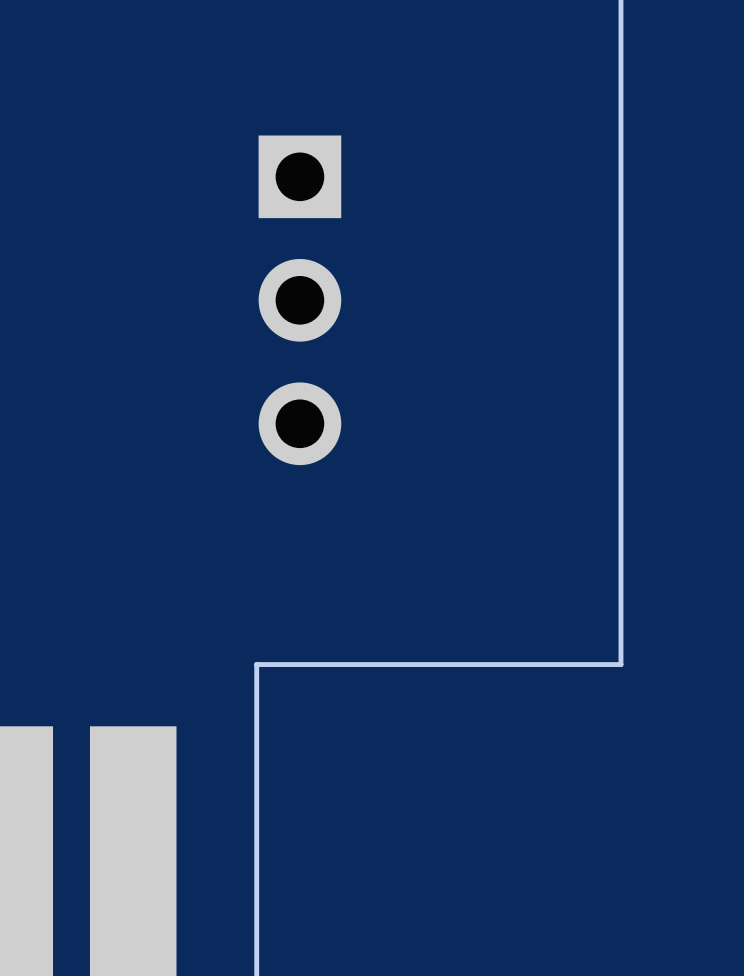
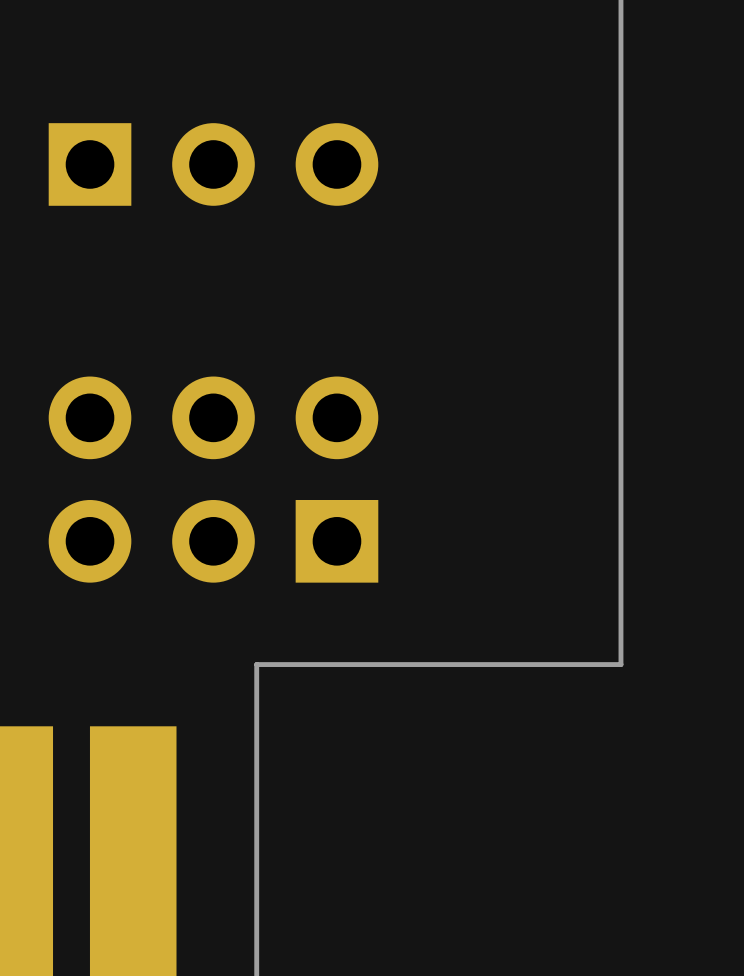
part rotation: 0° (299, 300) -> 90° counterclockwise (213, 164)
part: none -> (213, 479)

